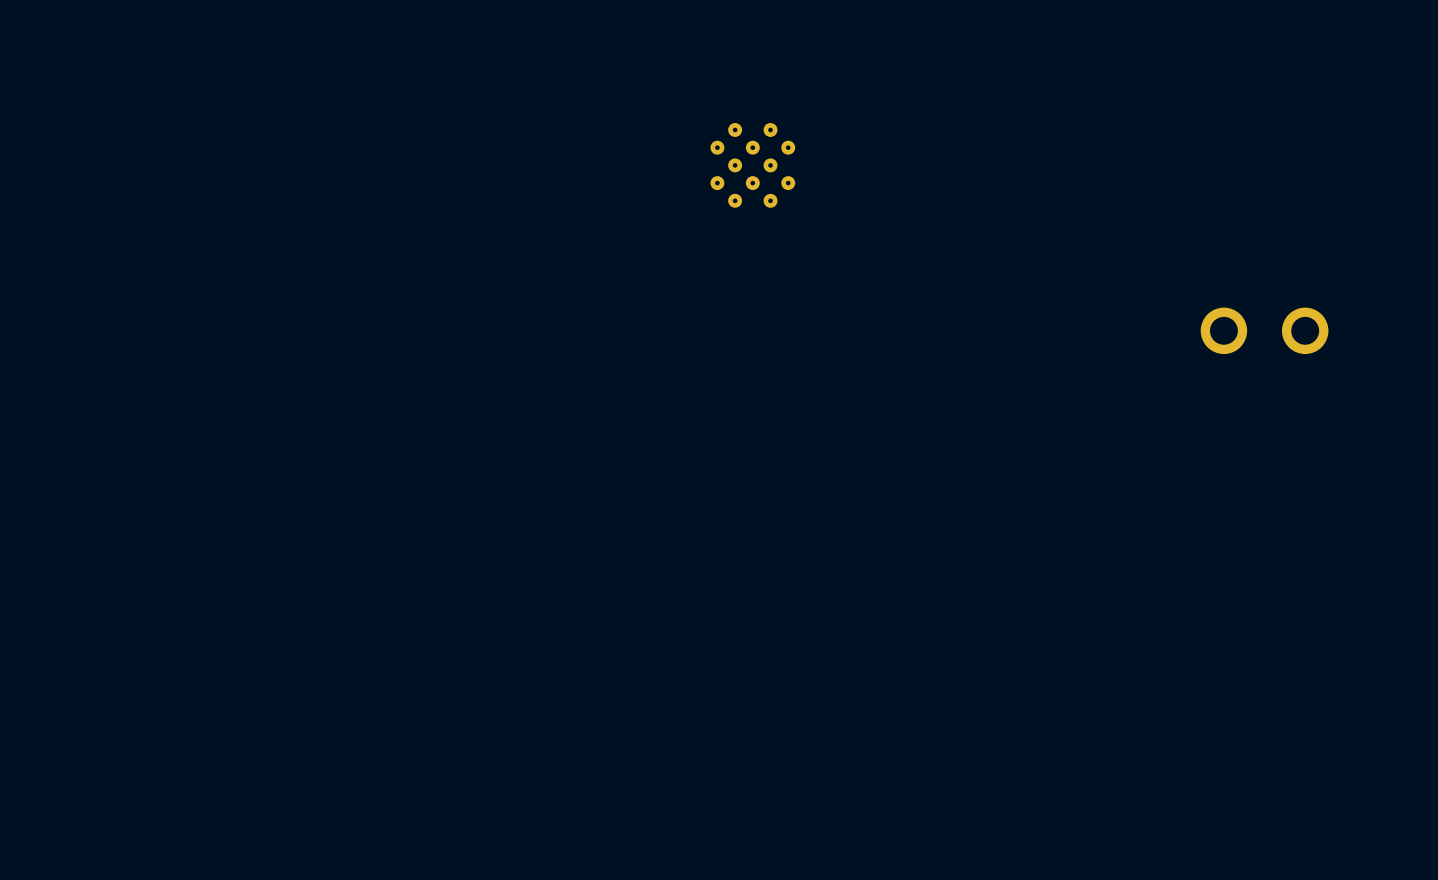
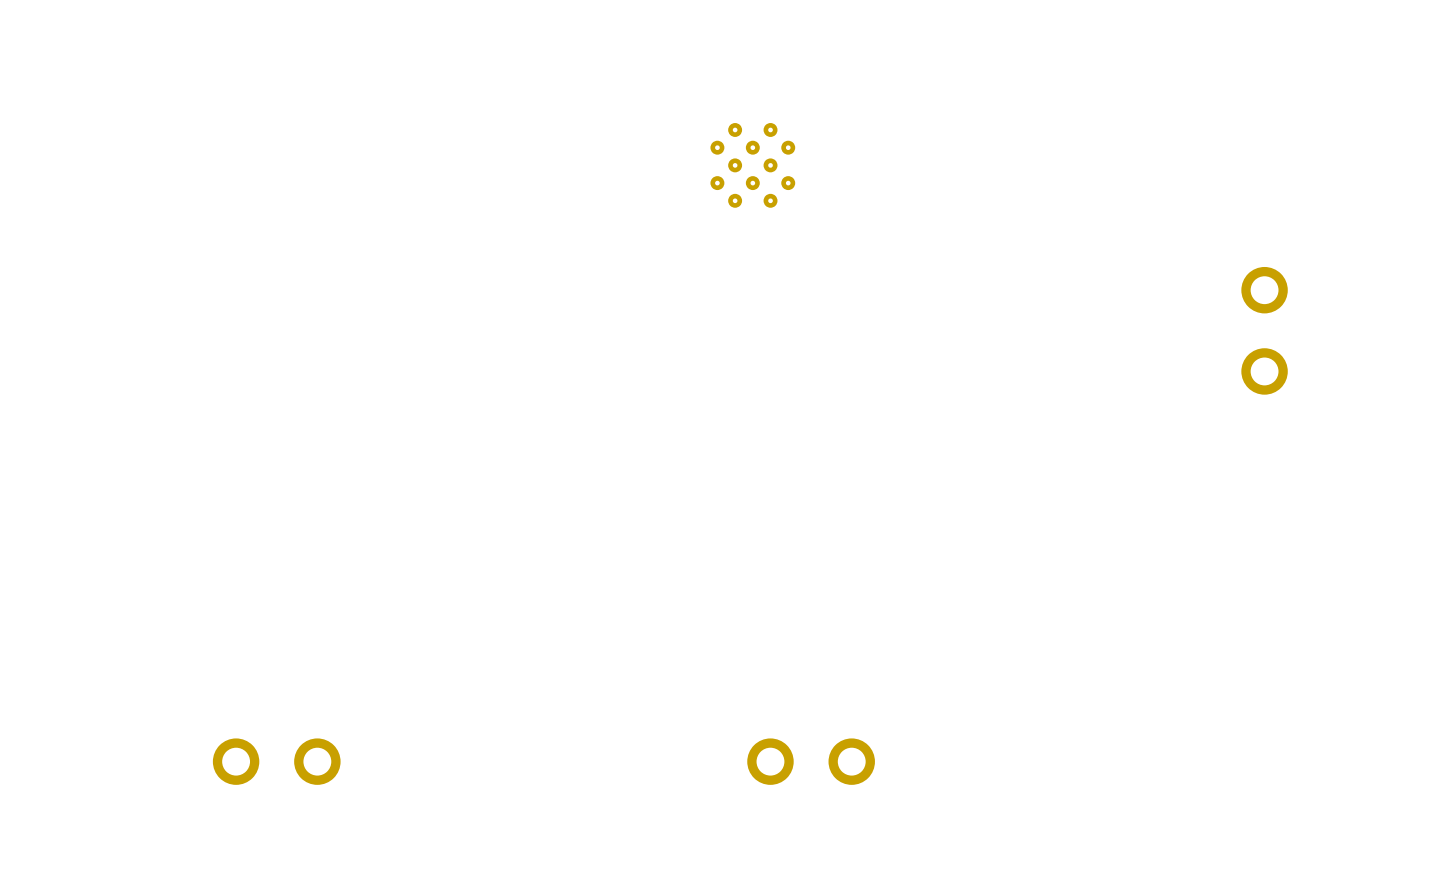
part rotation: 0° (1264, 330) -> 90° clockwise (1264, 330)
part: none -> (276, 761)
part: none -> (811, 761)

